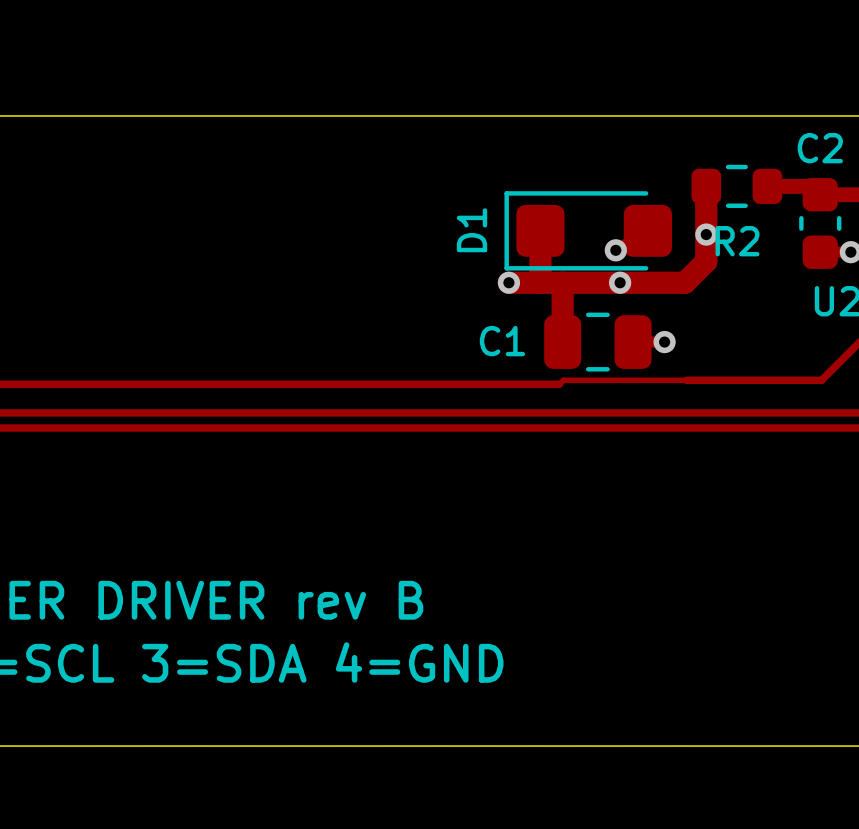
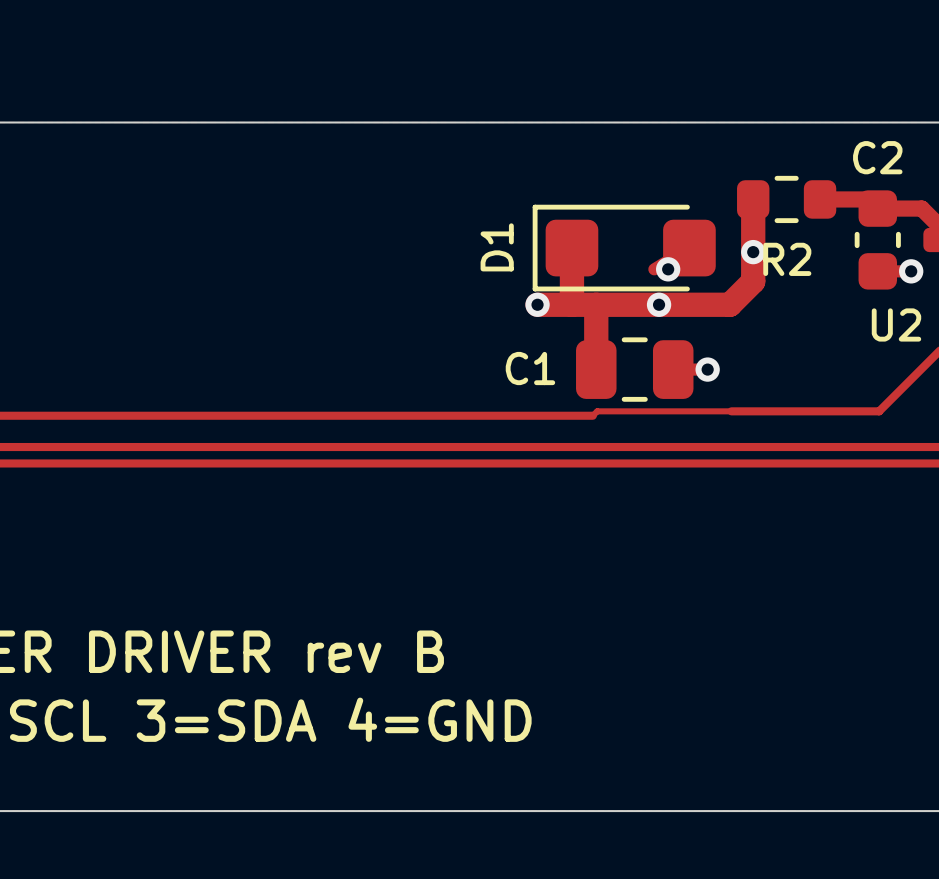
via position: (615, 250) -> (668, 269)

